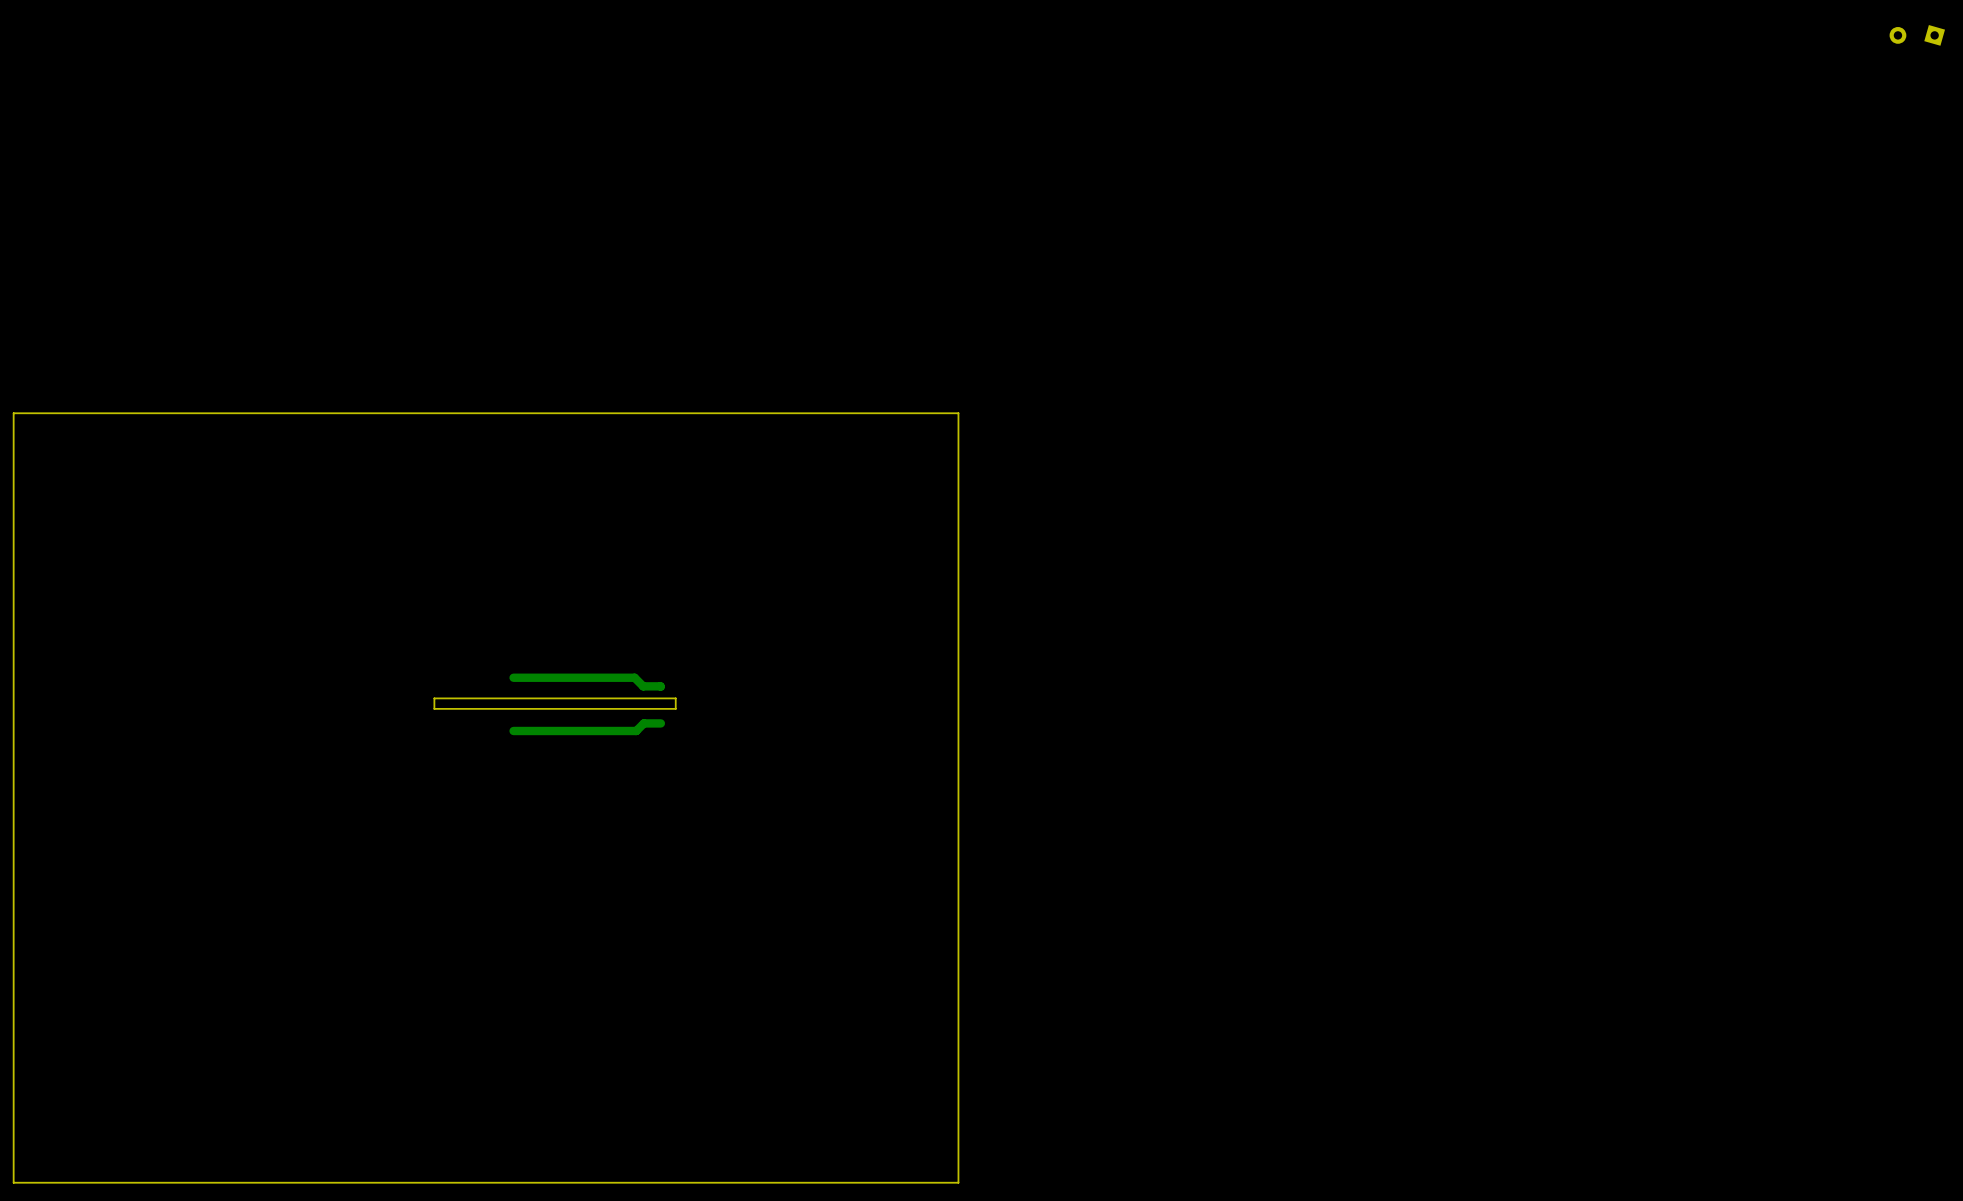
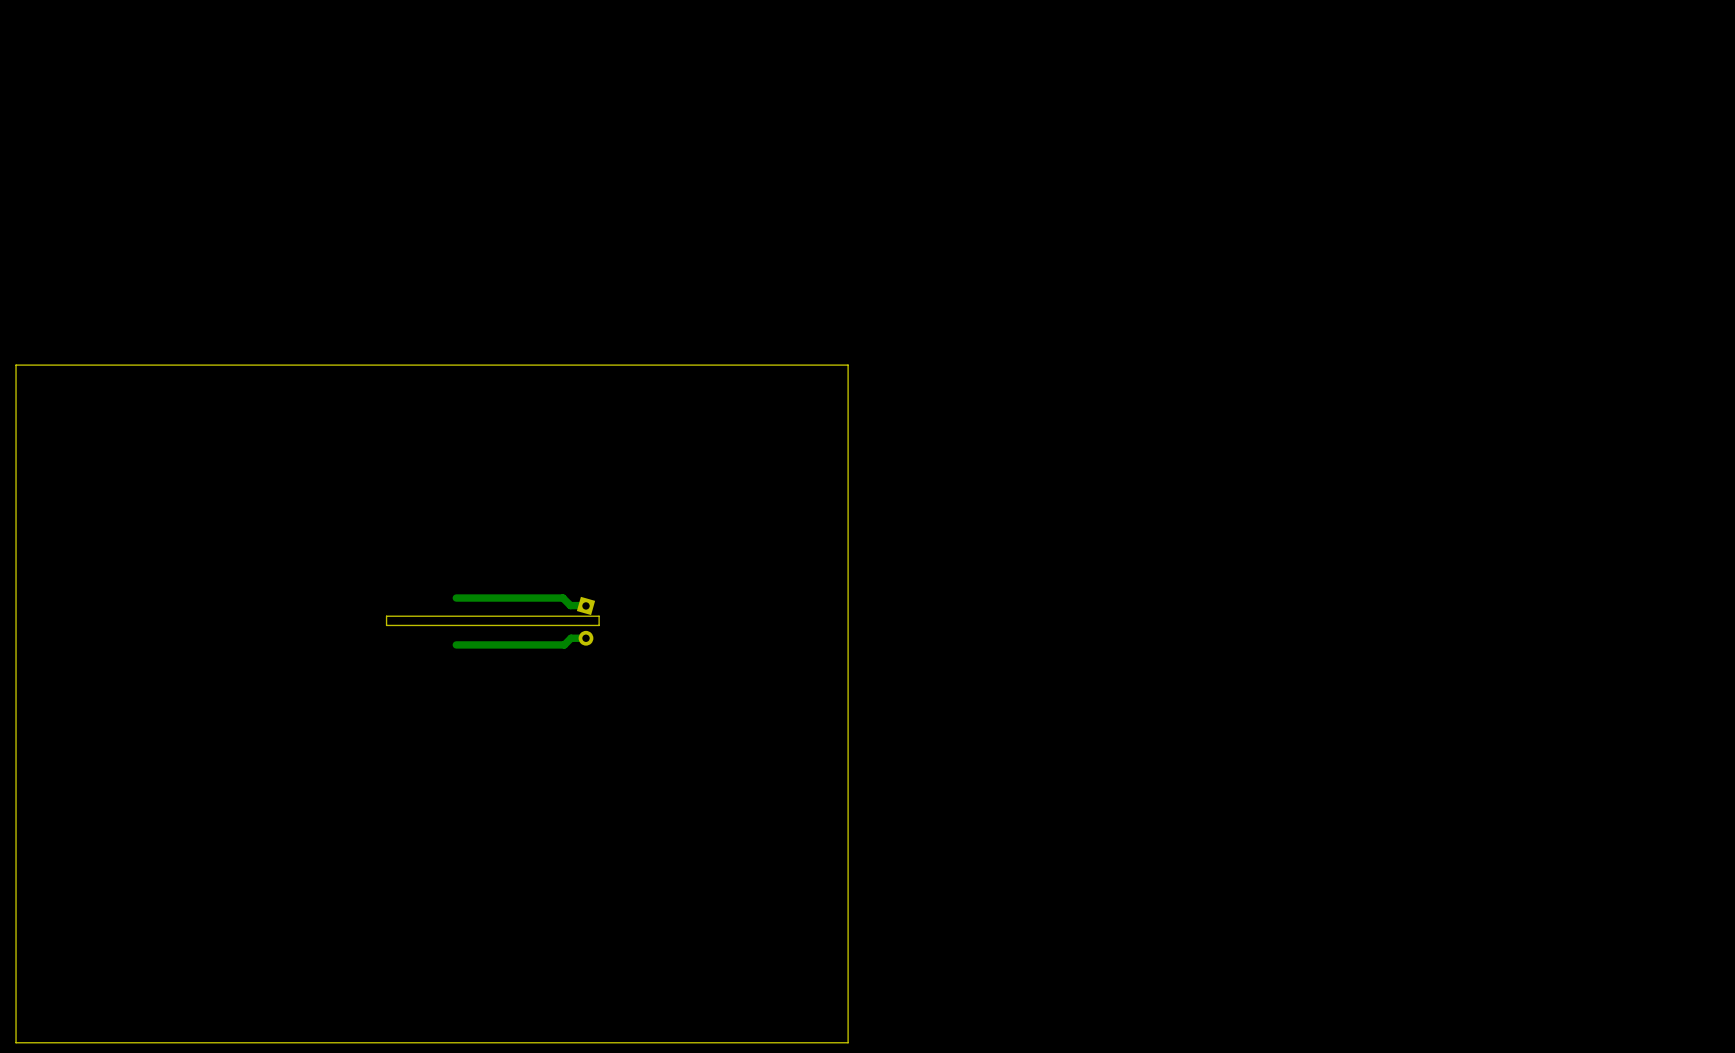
part: (1917, 35) -> none
part: none -> (586, 621)

